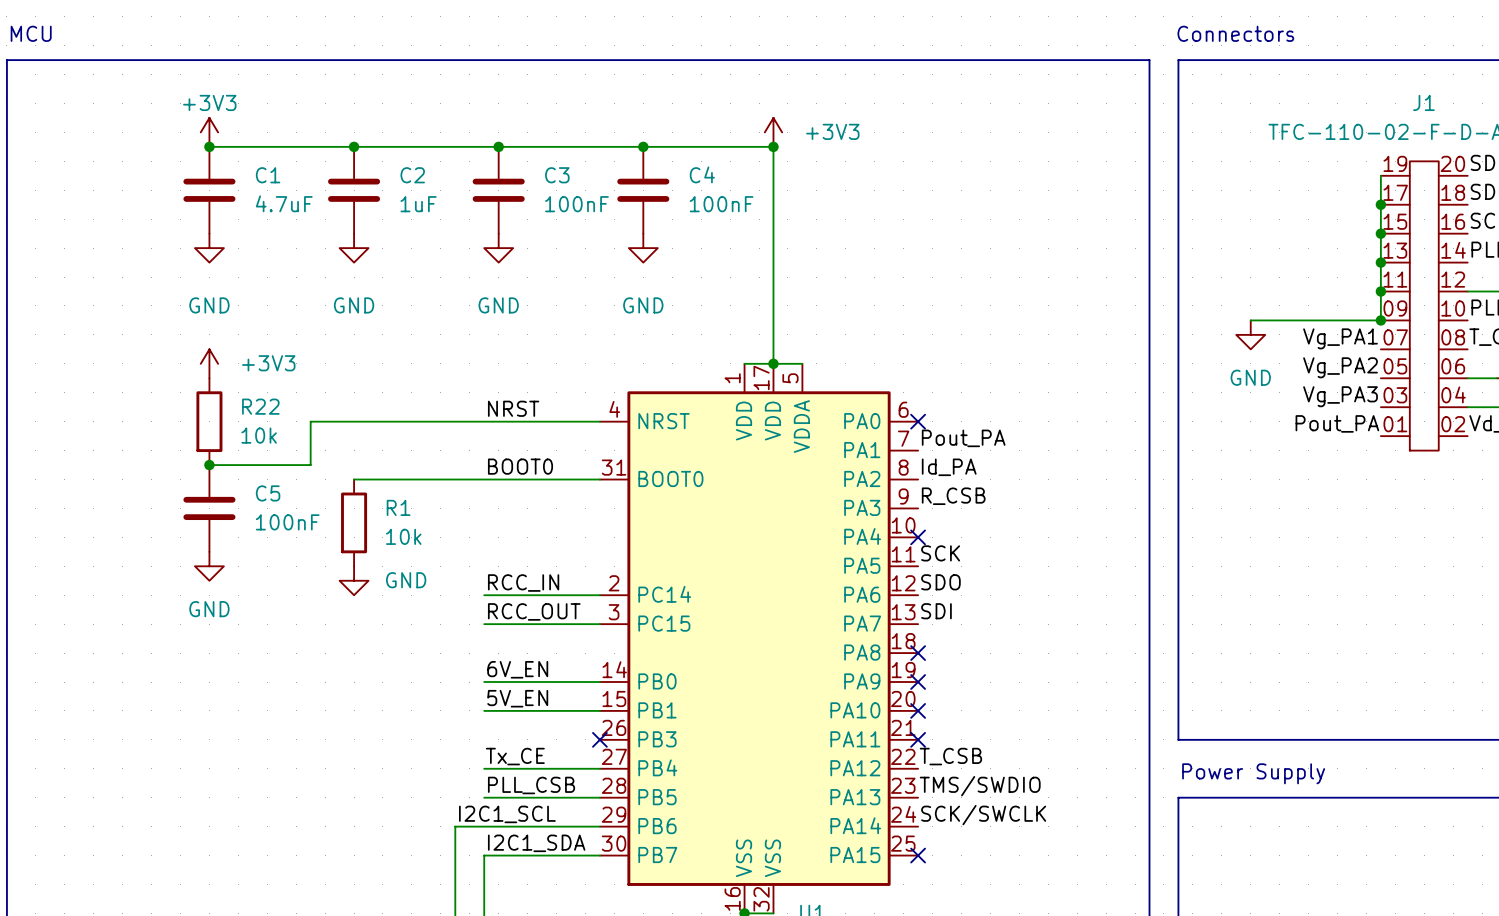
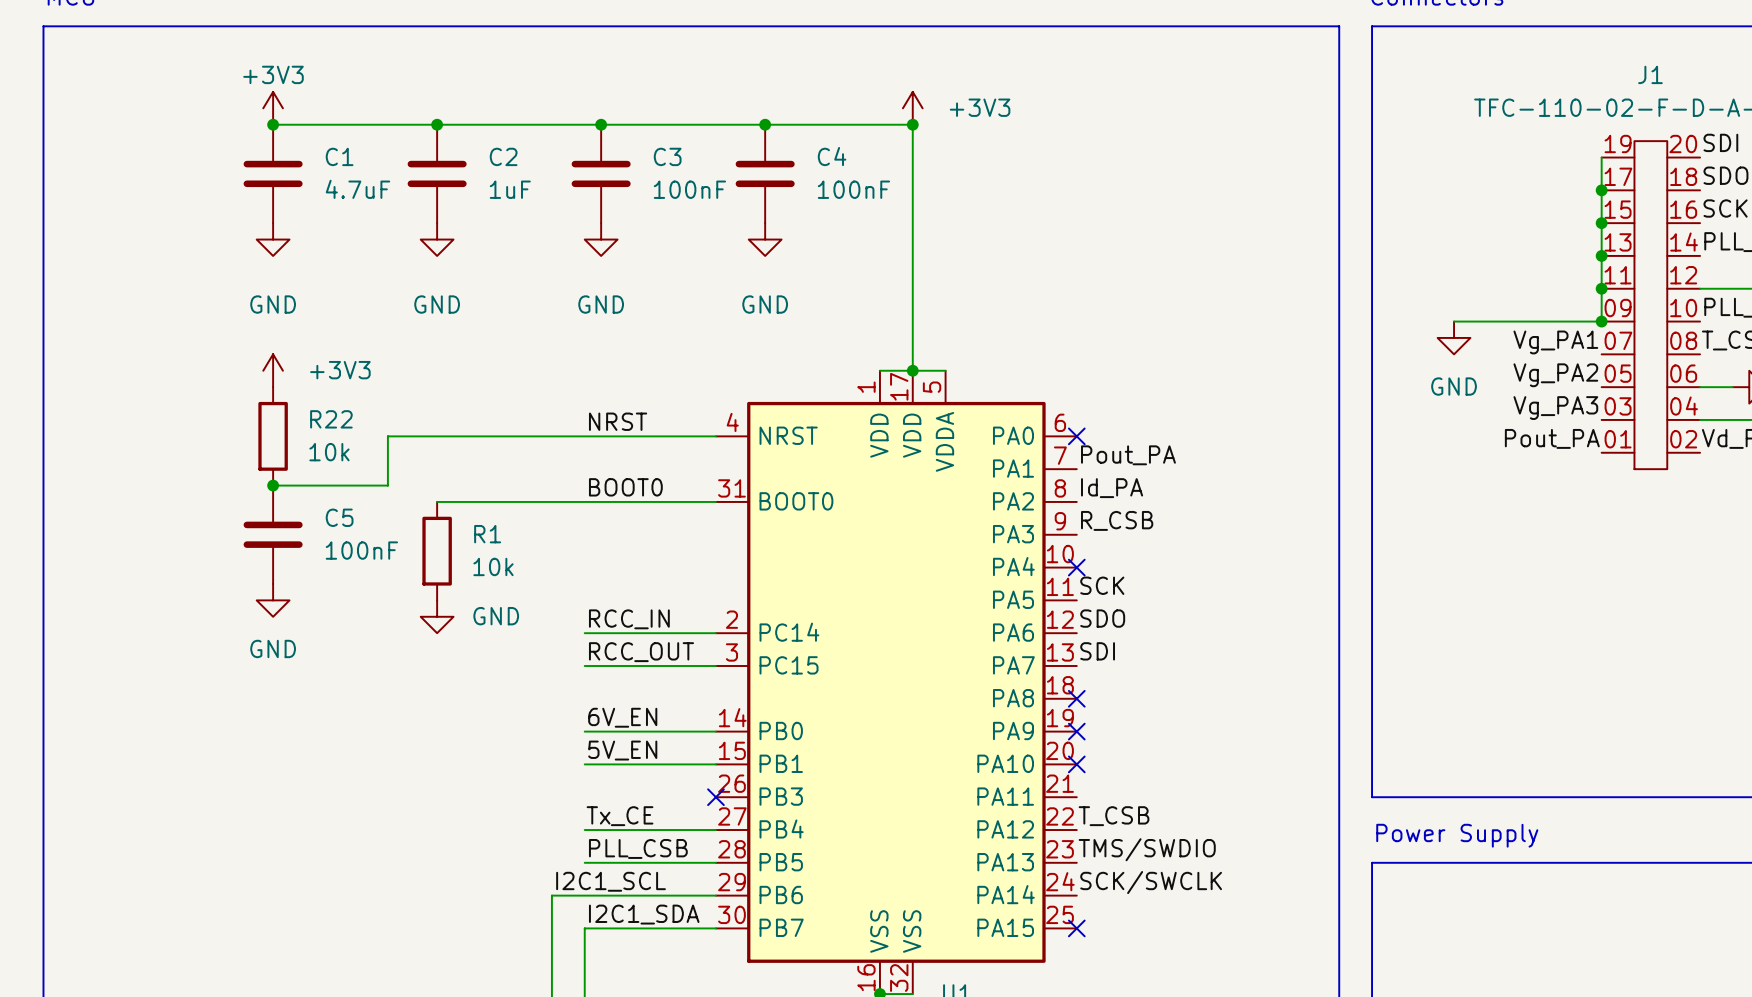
no-connect mark: (918, 739) -> none

